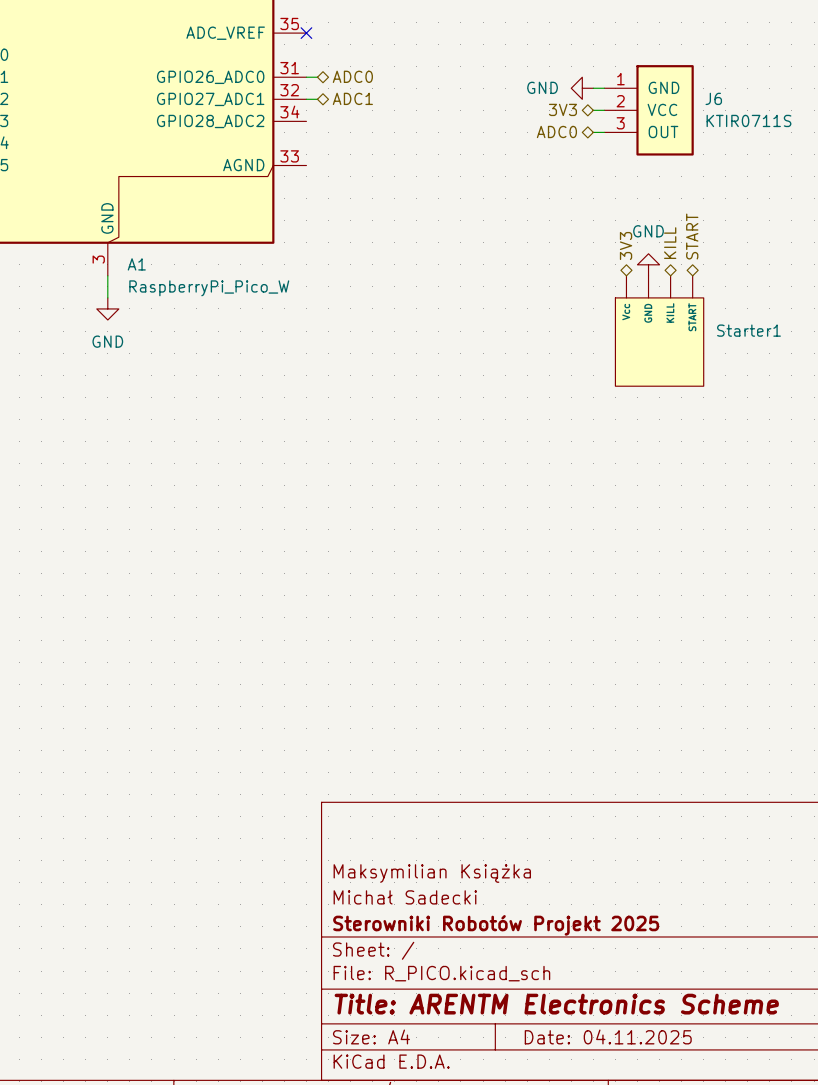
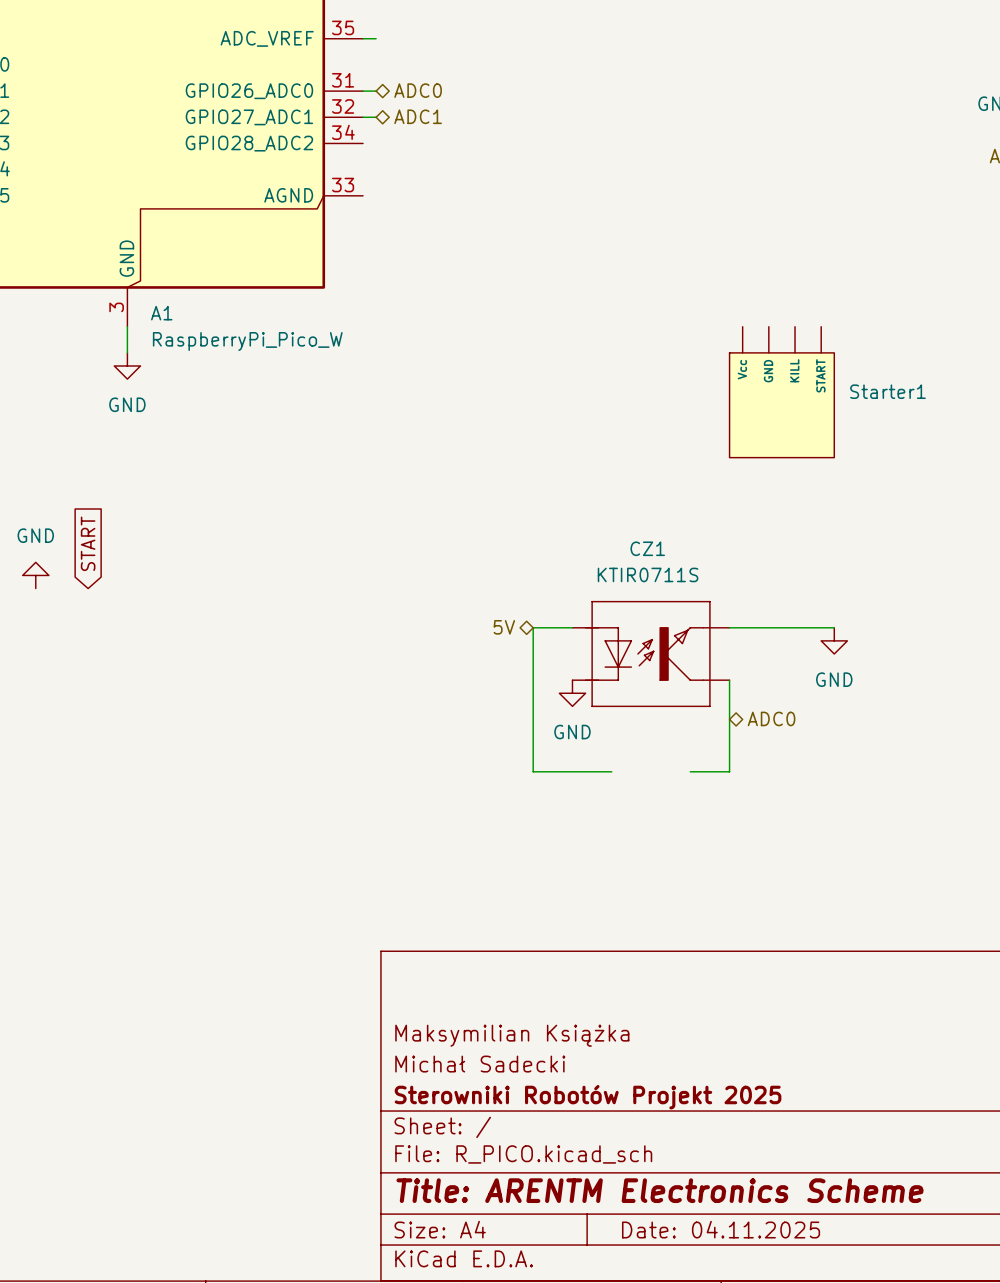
wire: none -> (363, 38) (376, 38)
no-connect mark: (306, 33) -> none
power symbol: GND (582, 88) -> none
wire: (593, 88) (604, 88) -> none
hierarchical label: 3V3 (562, 109) -> none
wire: (593, 110) (604, 110) -> none
J6: KTIR0711S (649, 110) -> none
hierarchical label: ADC0 (556, 131) -> none
wire: (593, 132) (604, 132) -> none
hierarchical label: START (692, 236) -> none
hierarchical label: KILL (670, 243) -> none
hierarchical label: 3V3 (626, 245) -> none
power symbol: GND (648, 264) -> none
global label: none -> START (88, 543)
power symbol: none -> GND (35, 575)
hierarchical label: none -> 5V (504, 627)
wire: none -> (572, 627) (533, 627) (533, 771) (611, 771)
wire: none -> (729, 627) (834, 627)
power symbol: none -> GND (834, 640)
CZ1: none -> KTIR0711S (651, 653)
wire: none -> (729, 680) (729, 771) (690, 771)
power symbol: none -> GND (572, 693)
hierarchical label: none -> ADC0 (771, 718)

